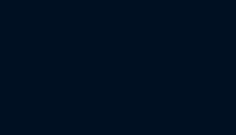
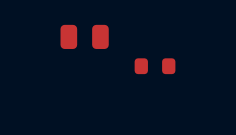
part: none -> (84, 36)
part: none -> (155, 66)

